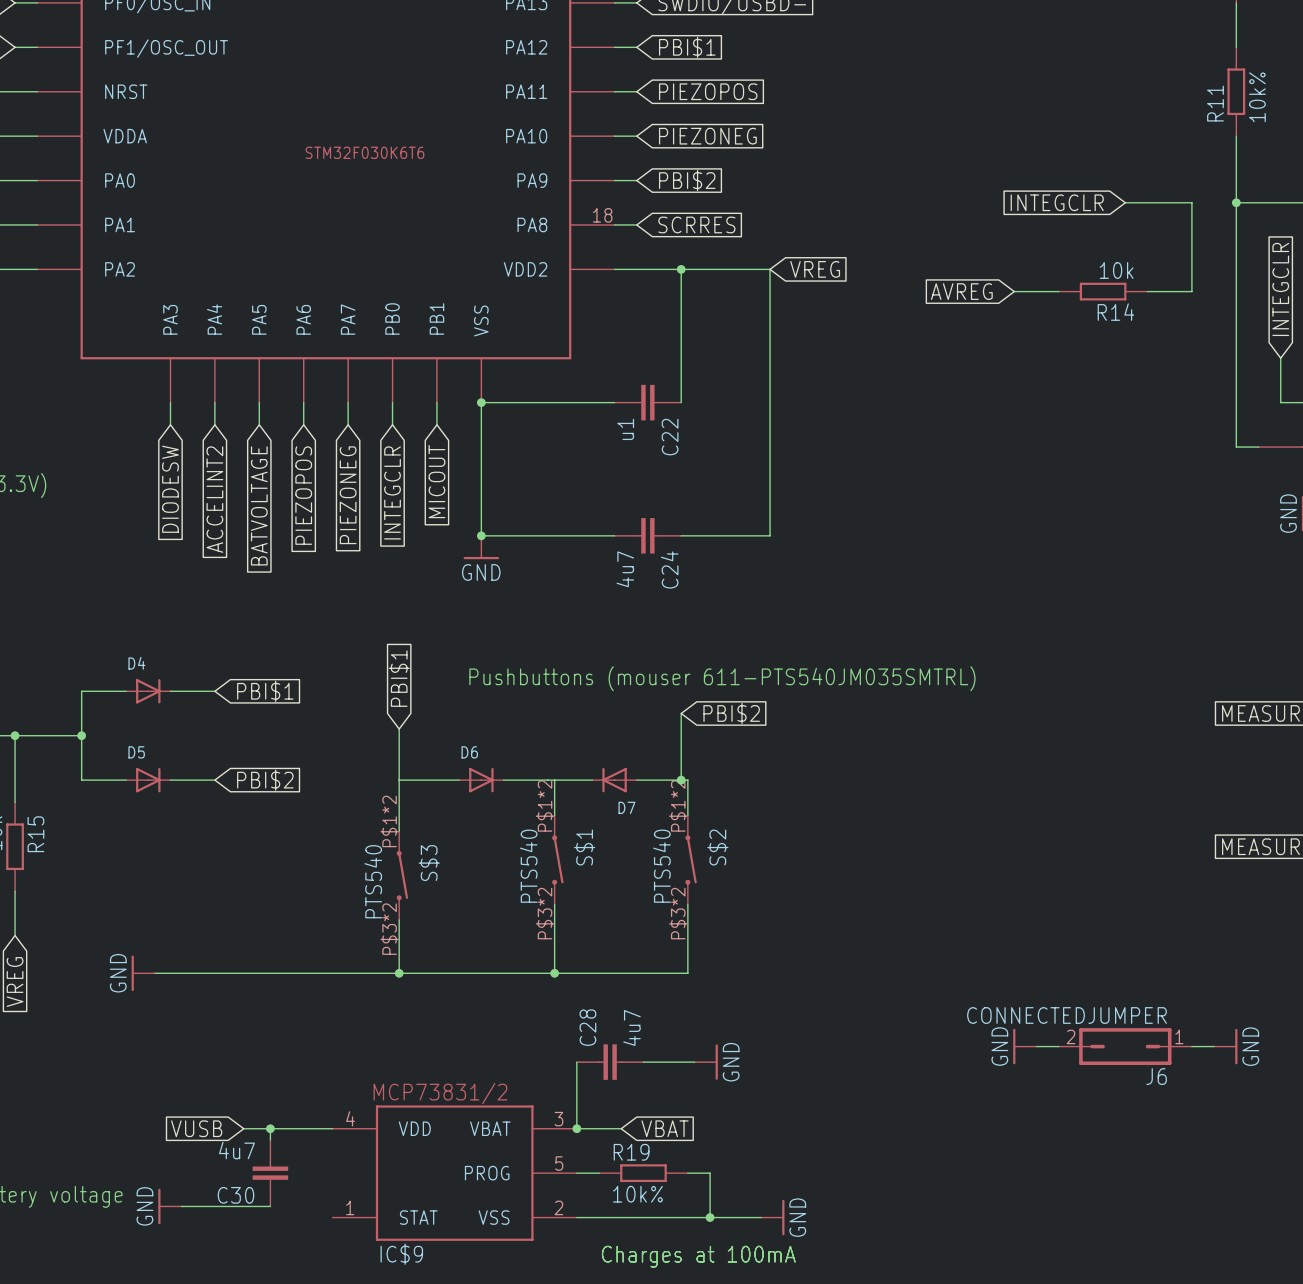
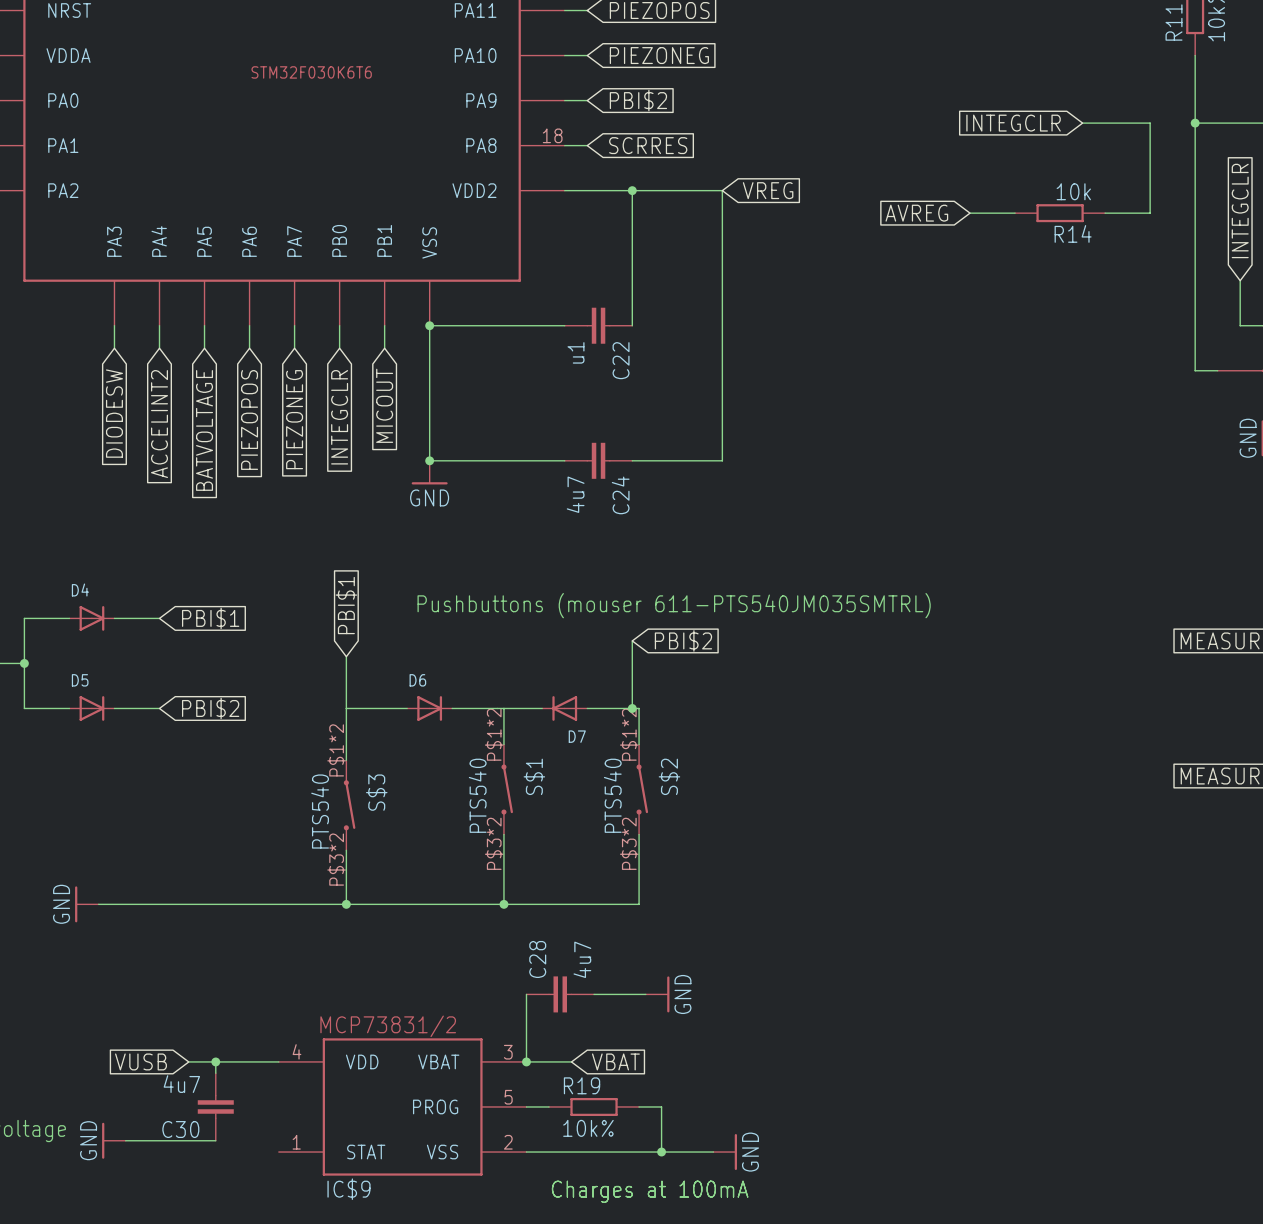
power symbol: GND (1024, 1046) -> none
wire: (1036, 1046) (1058, 1046) -> none
J6: CONNECTEDJUMPER (1125, 1046) -> none
wire: (1191, 1046) (1214, 1046) -> none
power symbol: GND (1225, 1046) -> none

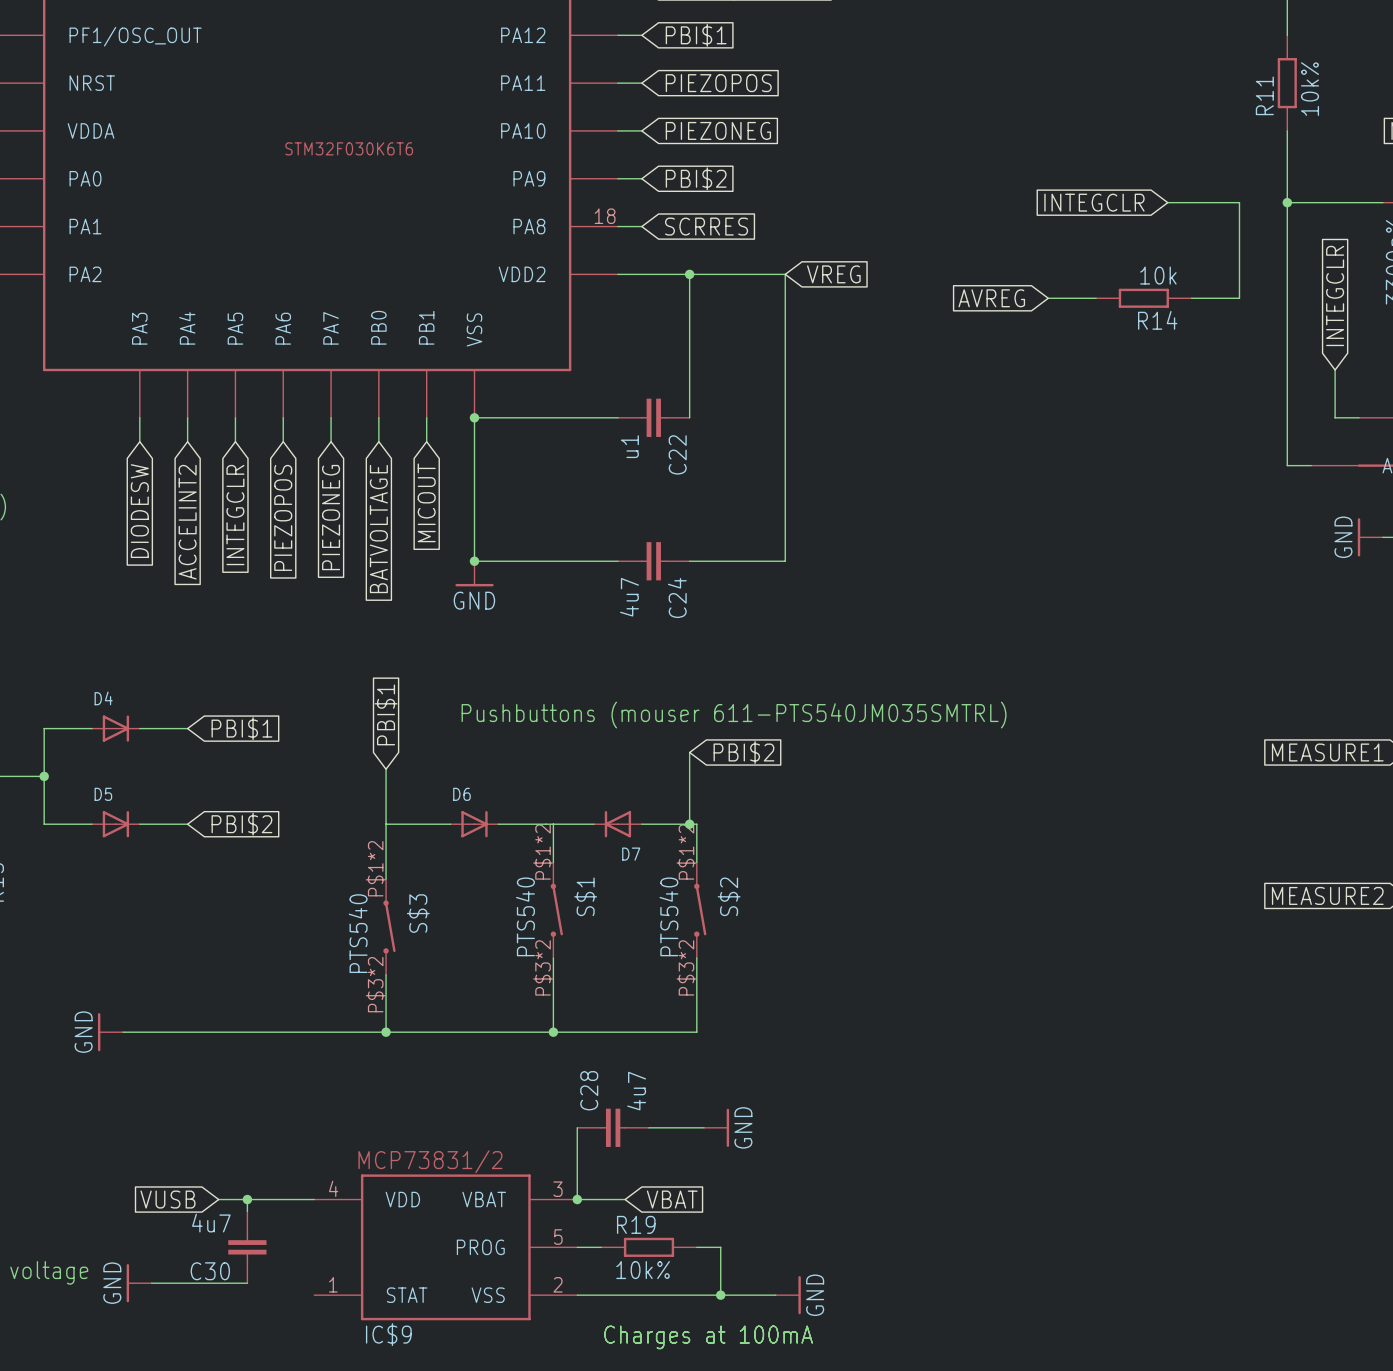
global label: INTEGCLR (339, 417) -> BATVOLTAGE (378, 529)
global label: BATVOLTAGE (204, 430) -> INTEGCLR (235, 515)

